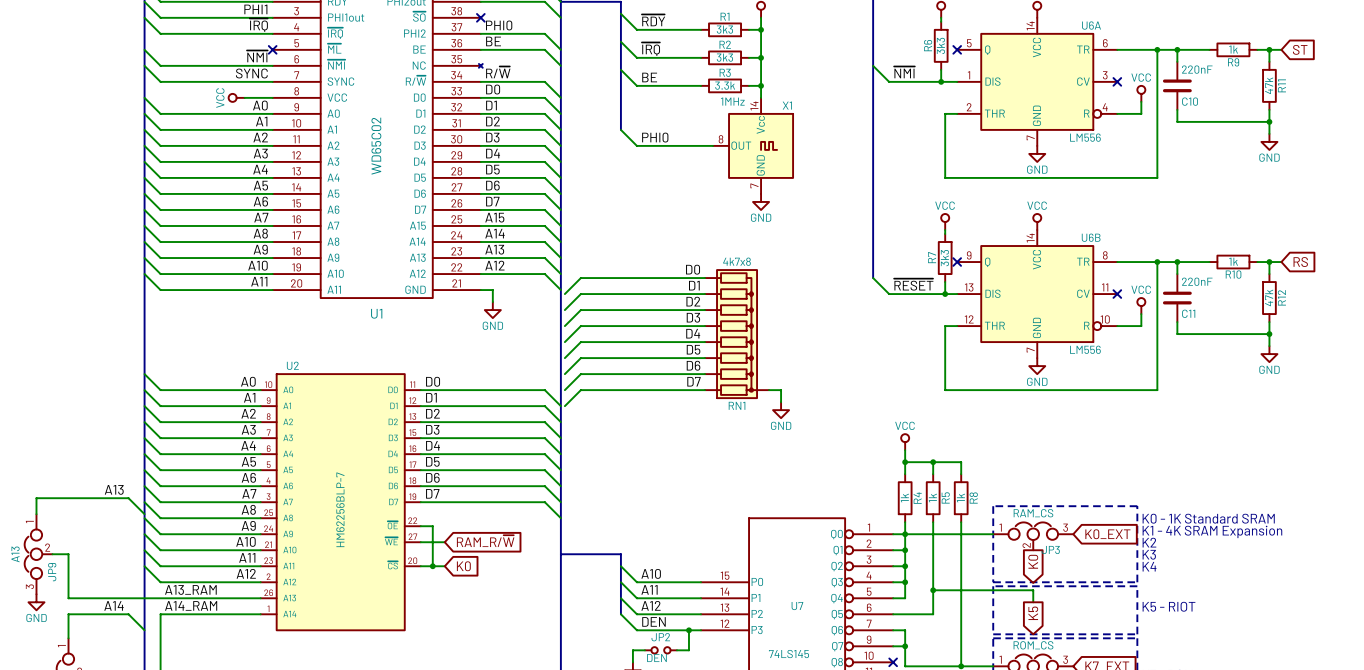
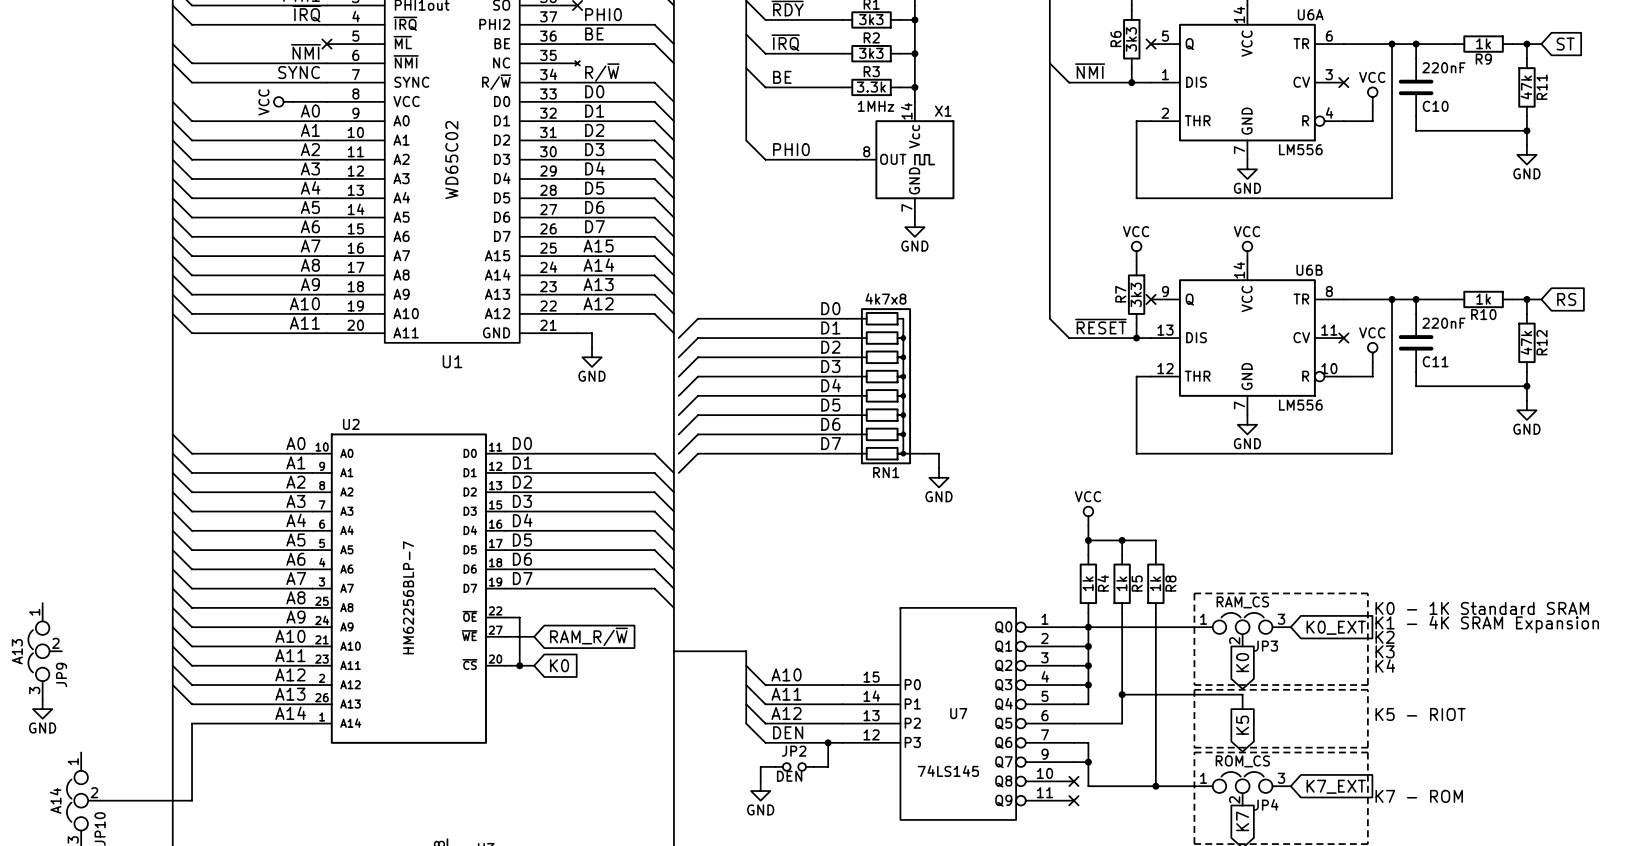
label: A13 (114, 489) -> none
wire: (36, 514) (36, 498) (128, 498) (144, 514) -> none
wire: (52, 554) (68, 554) (68, 598) (160, 598) -> (172, 685) (192, 704)
label: A13_RAM (190, 589) -> none
label: none -> A13 (290, 694)
label position: A14 (114, 605) -> A14 (290, 713)
label: A14_RAM (191, 605) -> none
wire: (144, 630) (128, 614) (68, 614) (68, 638) -> none

